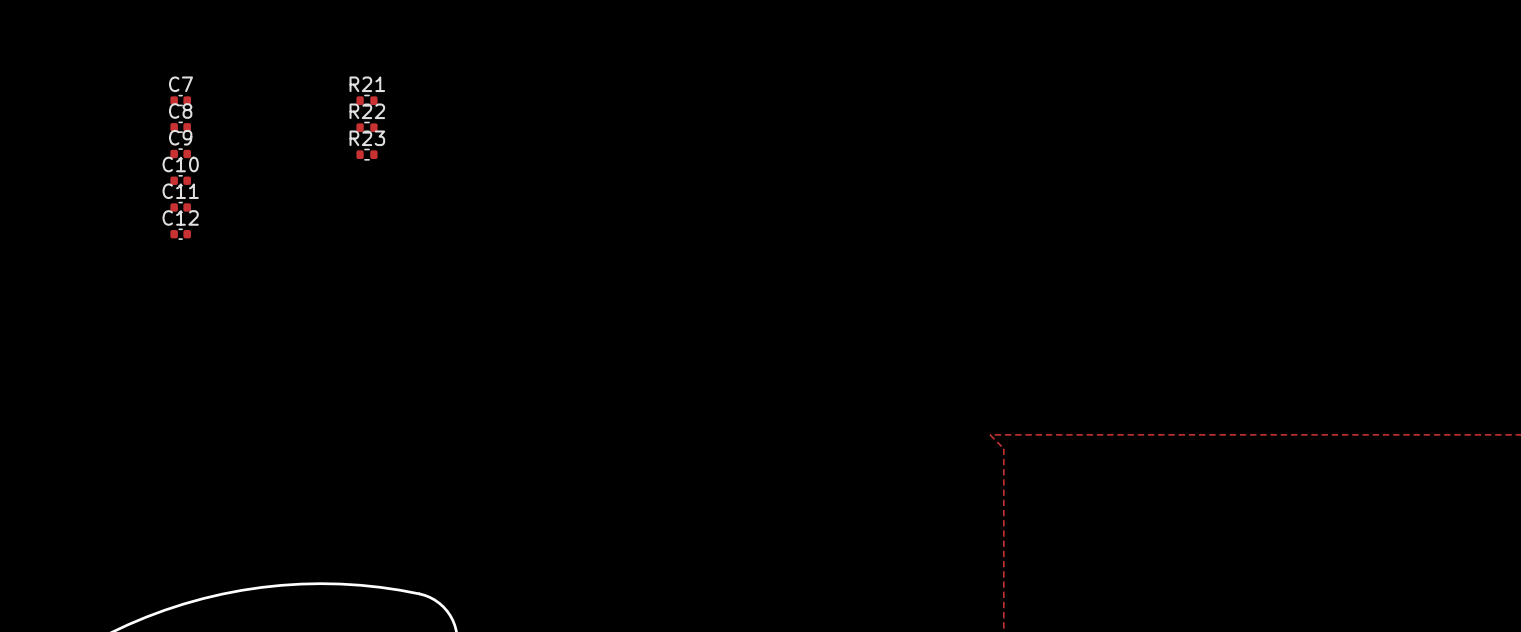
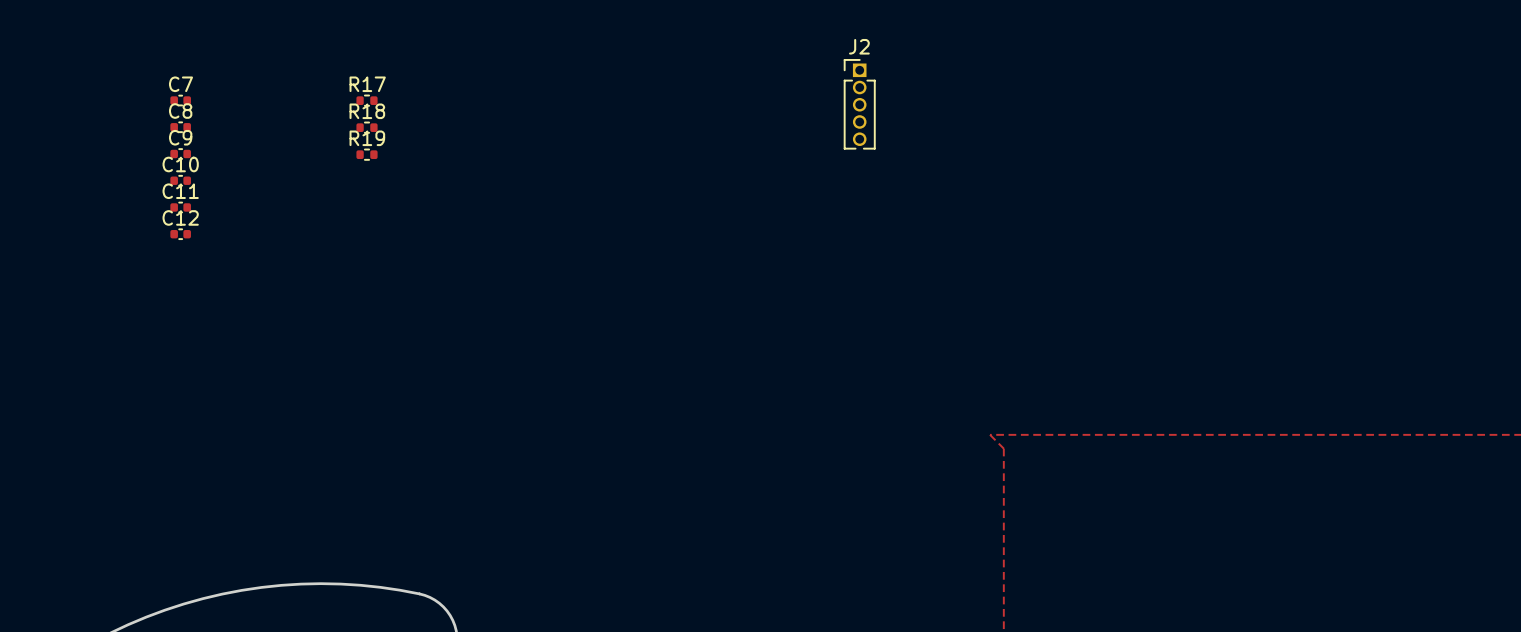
R21 name: R21 (367, 84) -> R17 (367, 84)
J2: none -> (859, 104)
R22 name: R22 (367, 111) -> R18 (367, 111)
R23 name: R23 (367, 138) -> R19 (367, 138)

